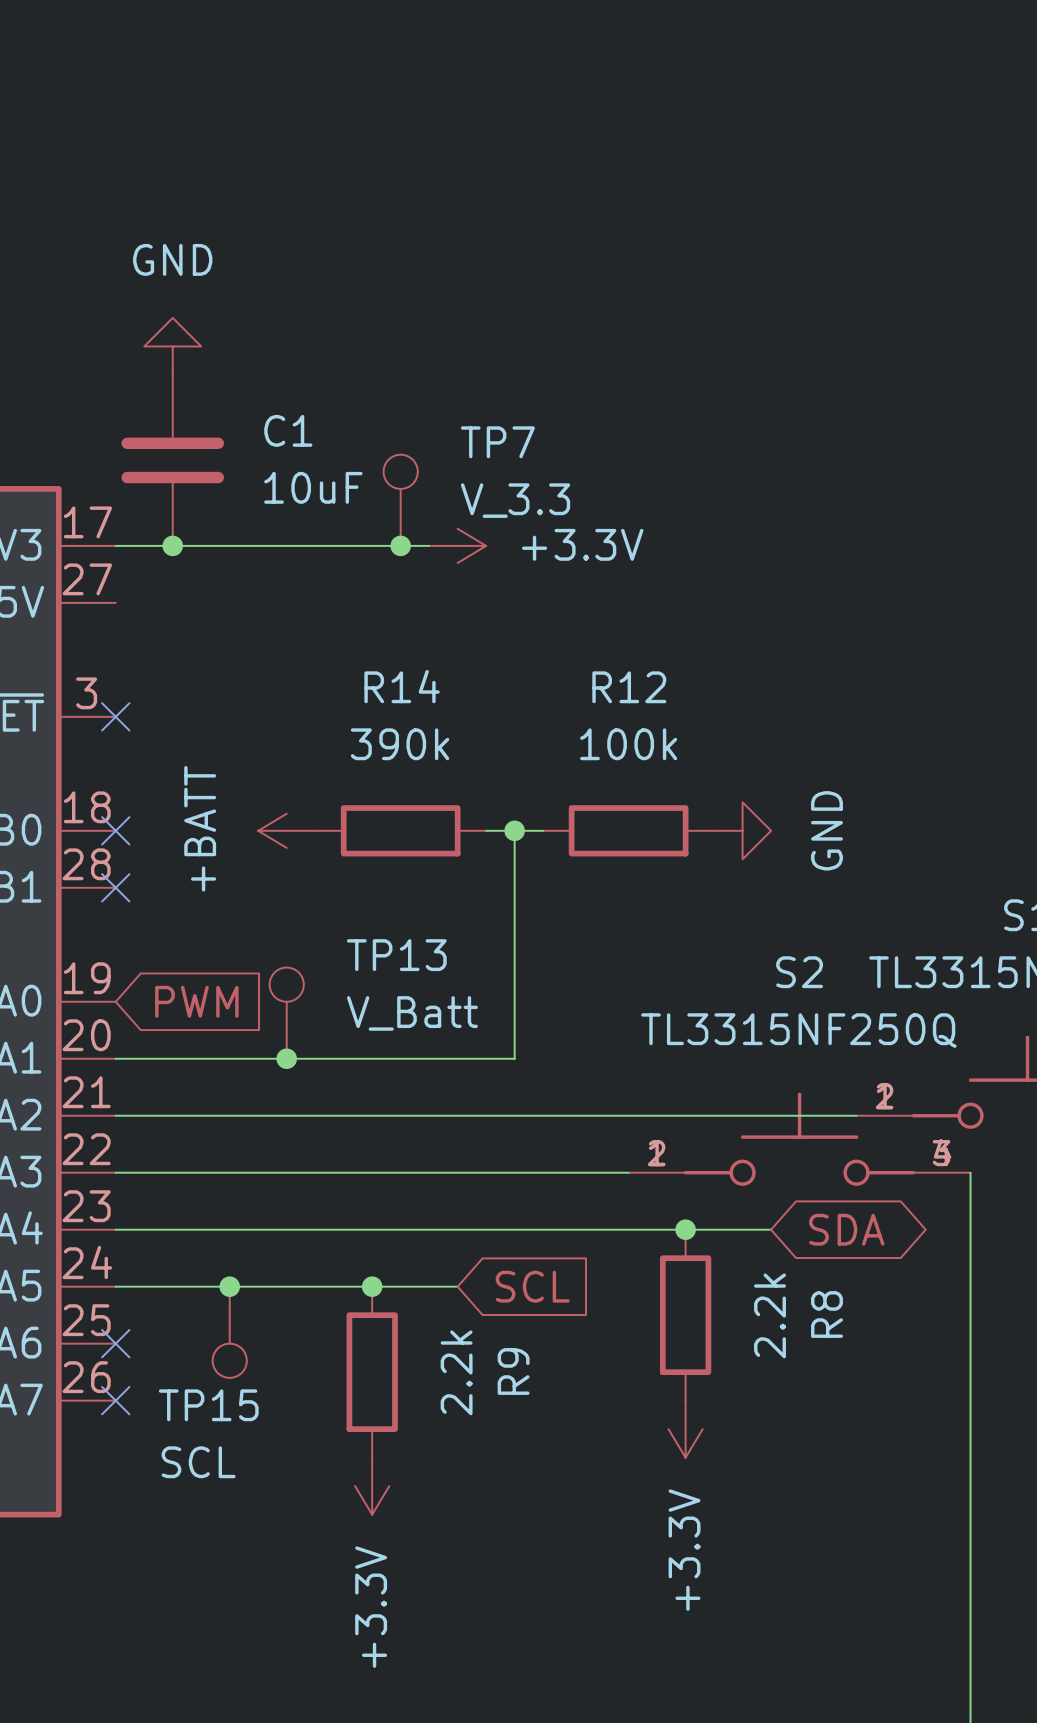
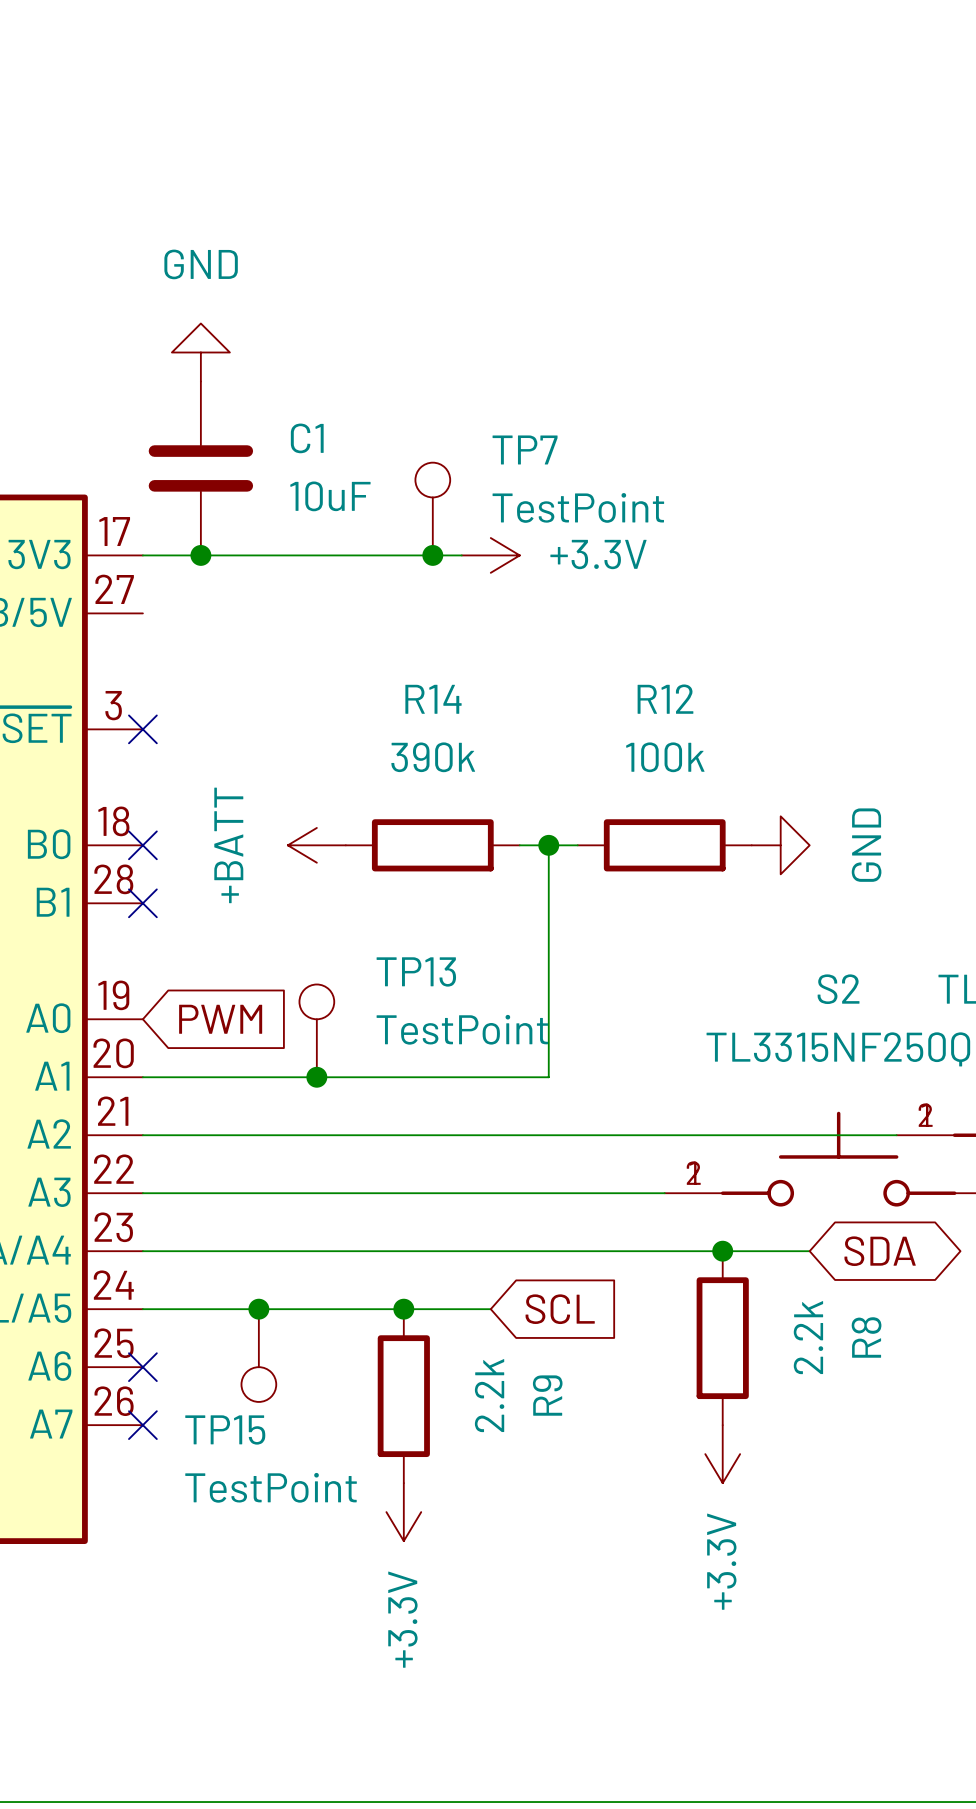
TP7 value: V_3.3 (515, 500) -> TestPoint (578, 507)
TP13 value: V_Batt (412, 1013) -> TestPoint (462, 1029)
TP15 value: SCL (198, 1462) -> TestPoint (271, 1487)

